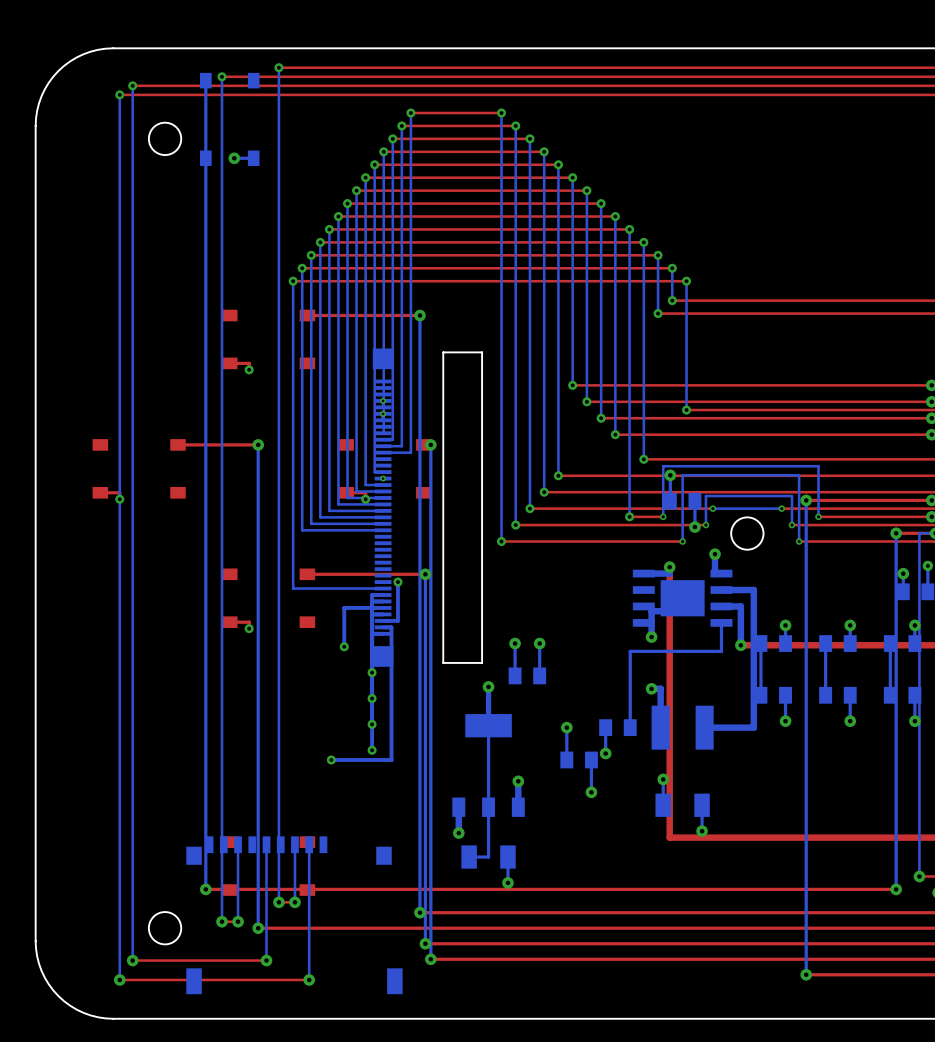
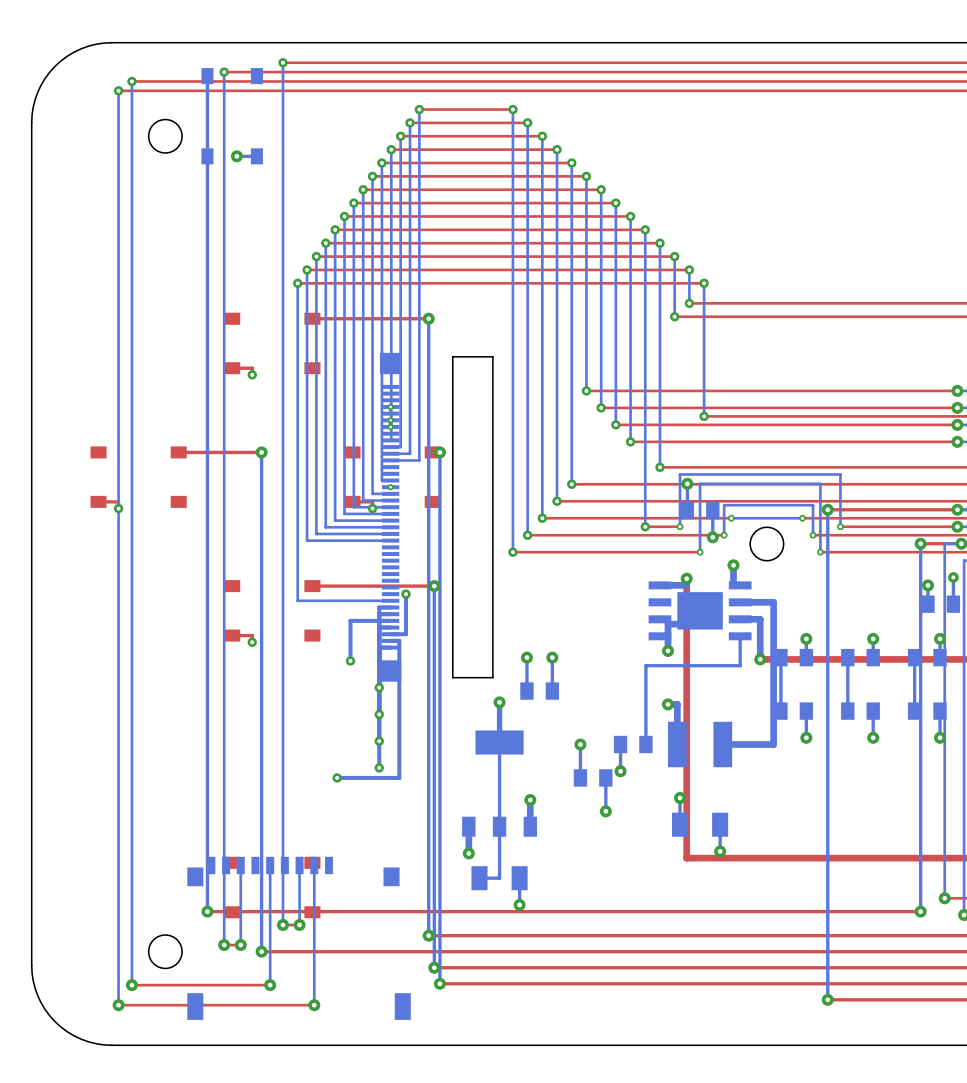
via: none -> (390, 427)

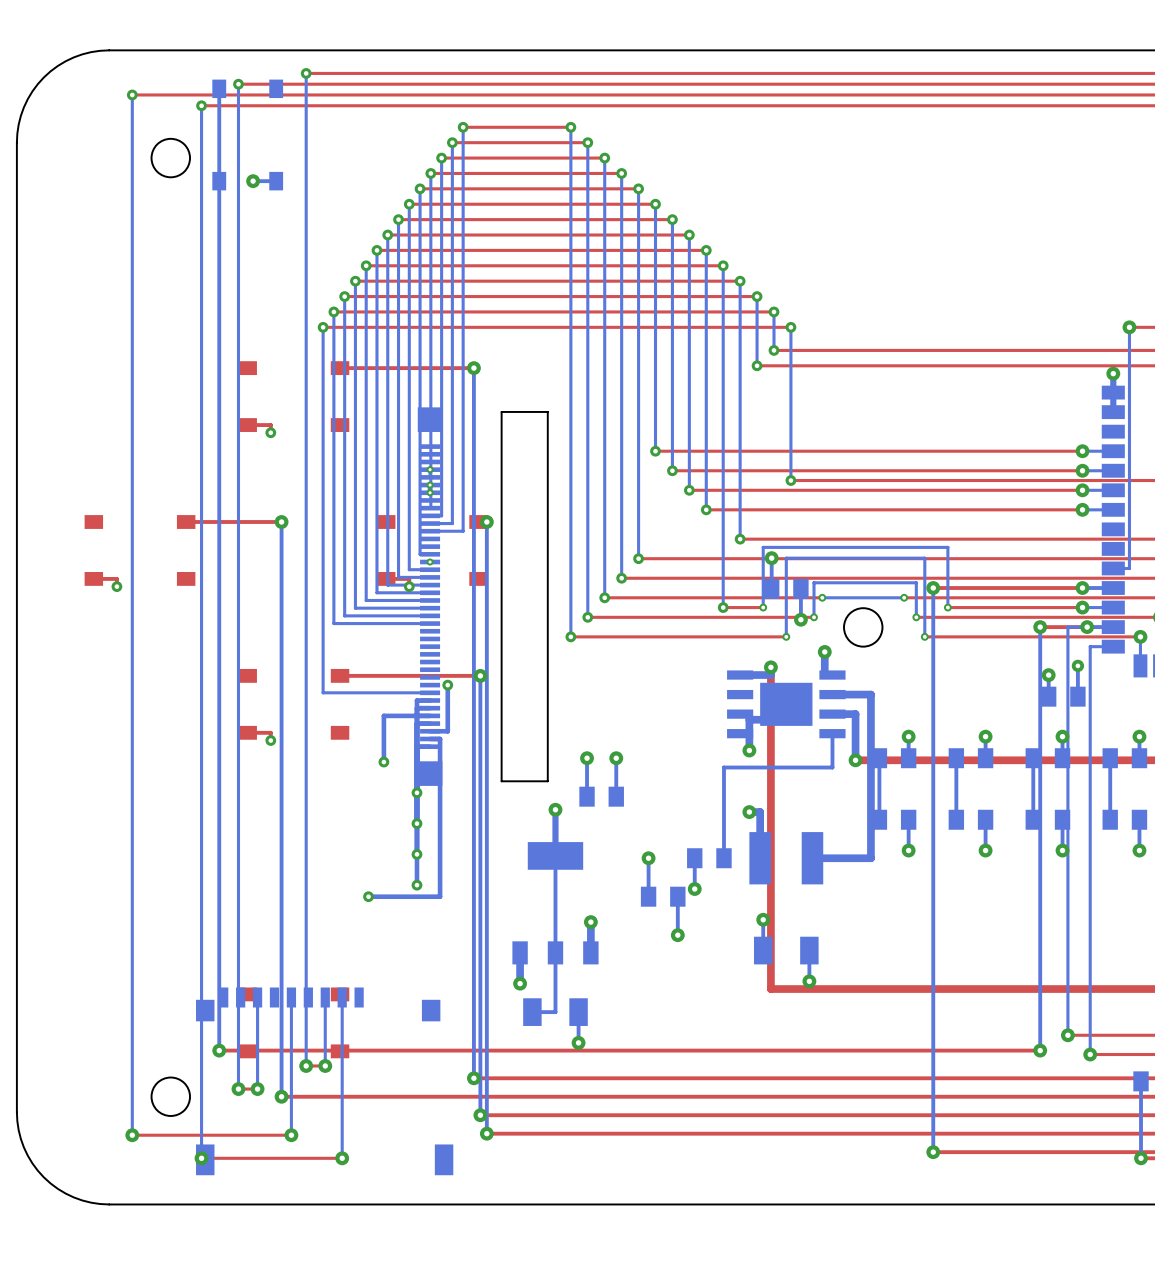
bottom track: (118, 90) (118, 1005) -> (201, 105) (201, 1158)
via position: (118, 90) -> (201, 105)
top track: (192, 90) (118, 90) -> none
via position: (118, 1005) -> (201, 1158)
top track: (192, 1005) (118, 1005) -> none

